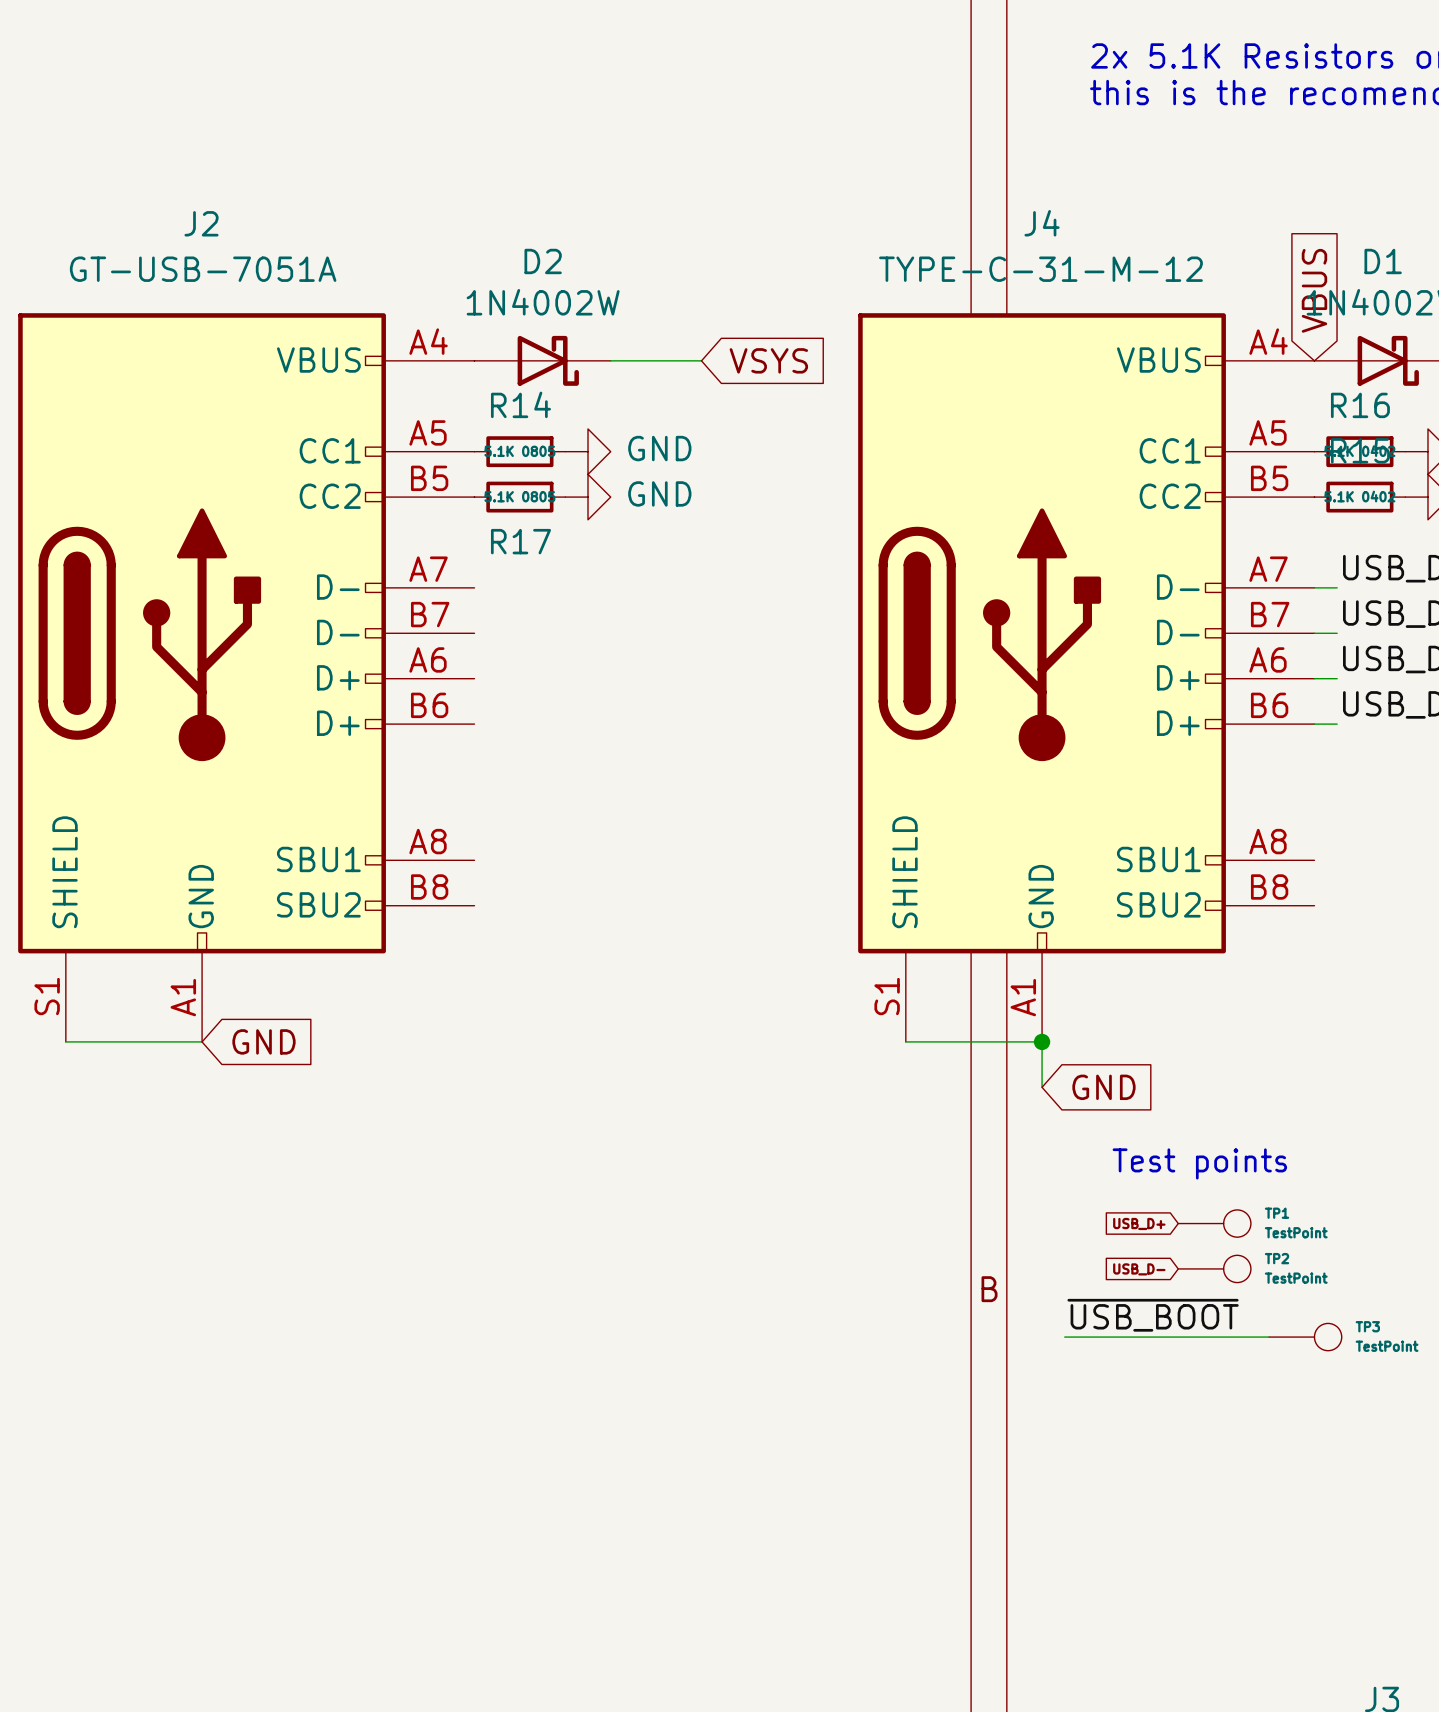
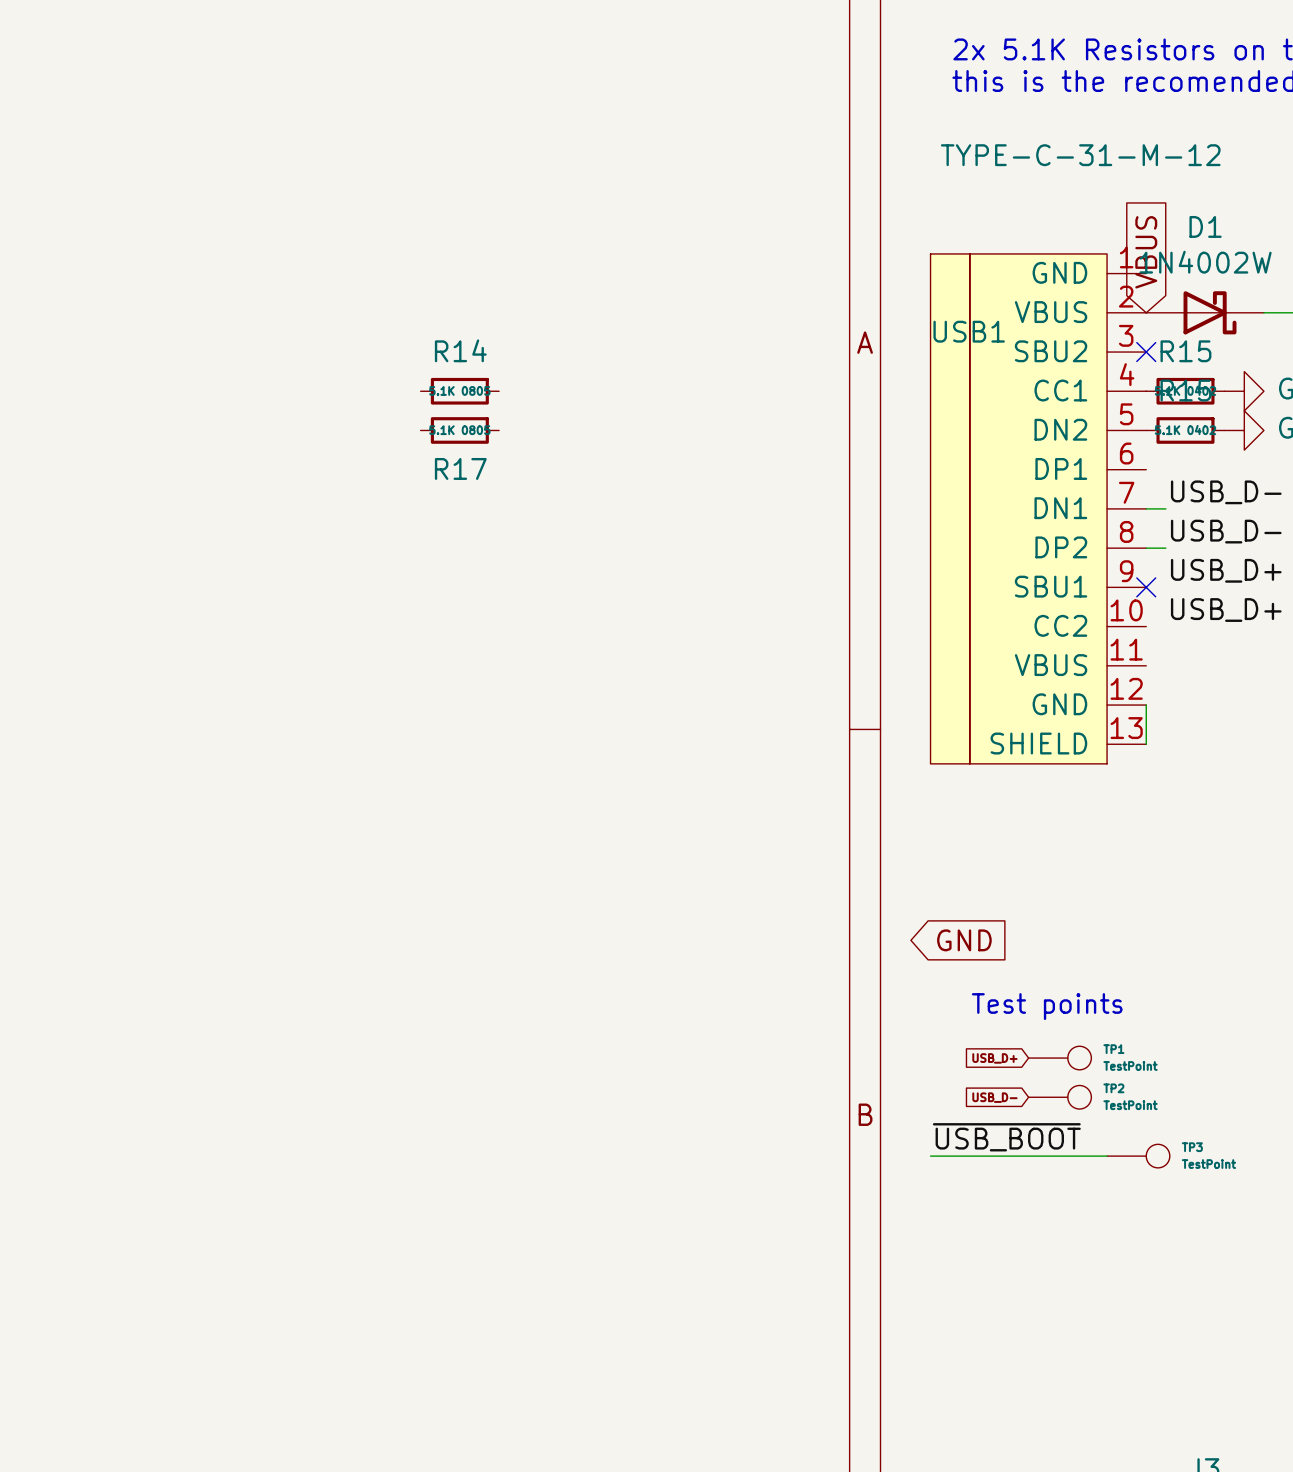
D2: 1N4002W (542, 360) -> none
wire: (610, 360) (701, 360) -> none
global label: VSYS (768, 360) -> none
R16 name: R16 (1360, 405) -> R15 (1185, 351)
no-connect mark: none -> (1146, 352)
power symbol: GND (588, 451) -> none
power symbol: GND (588, 497) -> none
USB1: none -> TYPE-C-31-M-12 (1038, 508)
J2: GT-USB-7051A (246, 677) -> none
J4: TYPE-C-31-M-12 (1086, 677) -> none
wire: (1314, 678) (1337, 678) -> none
no-connect mark: none -> (1146, 587)
wire: (1314, 724) (1337, 724) -> none
wire: none -> (1146, 705) (1146, 744)
wire: (65, 1041) (202, 1041) -> none
global label: GND (263, 1041) -> none
wire: (905, 1041) (1042, 1041) (1042, 1087) -> none
junction: (1042, 1041) -> none

